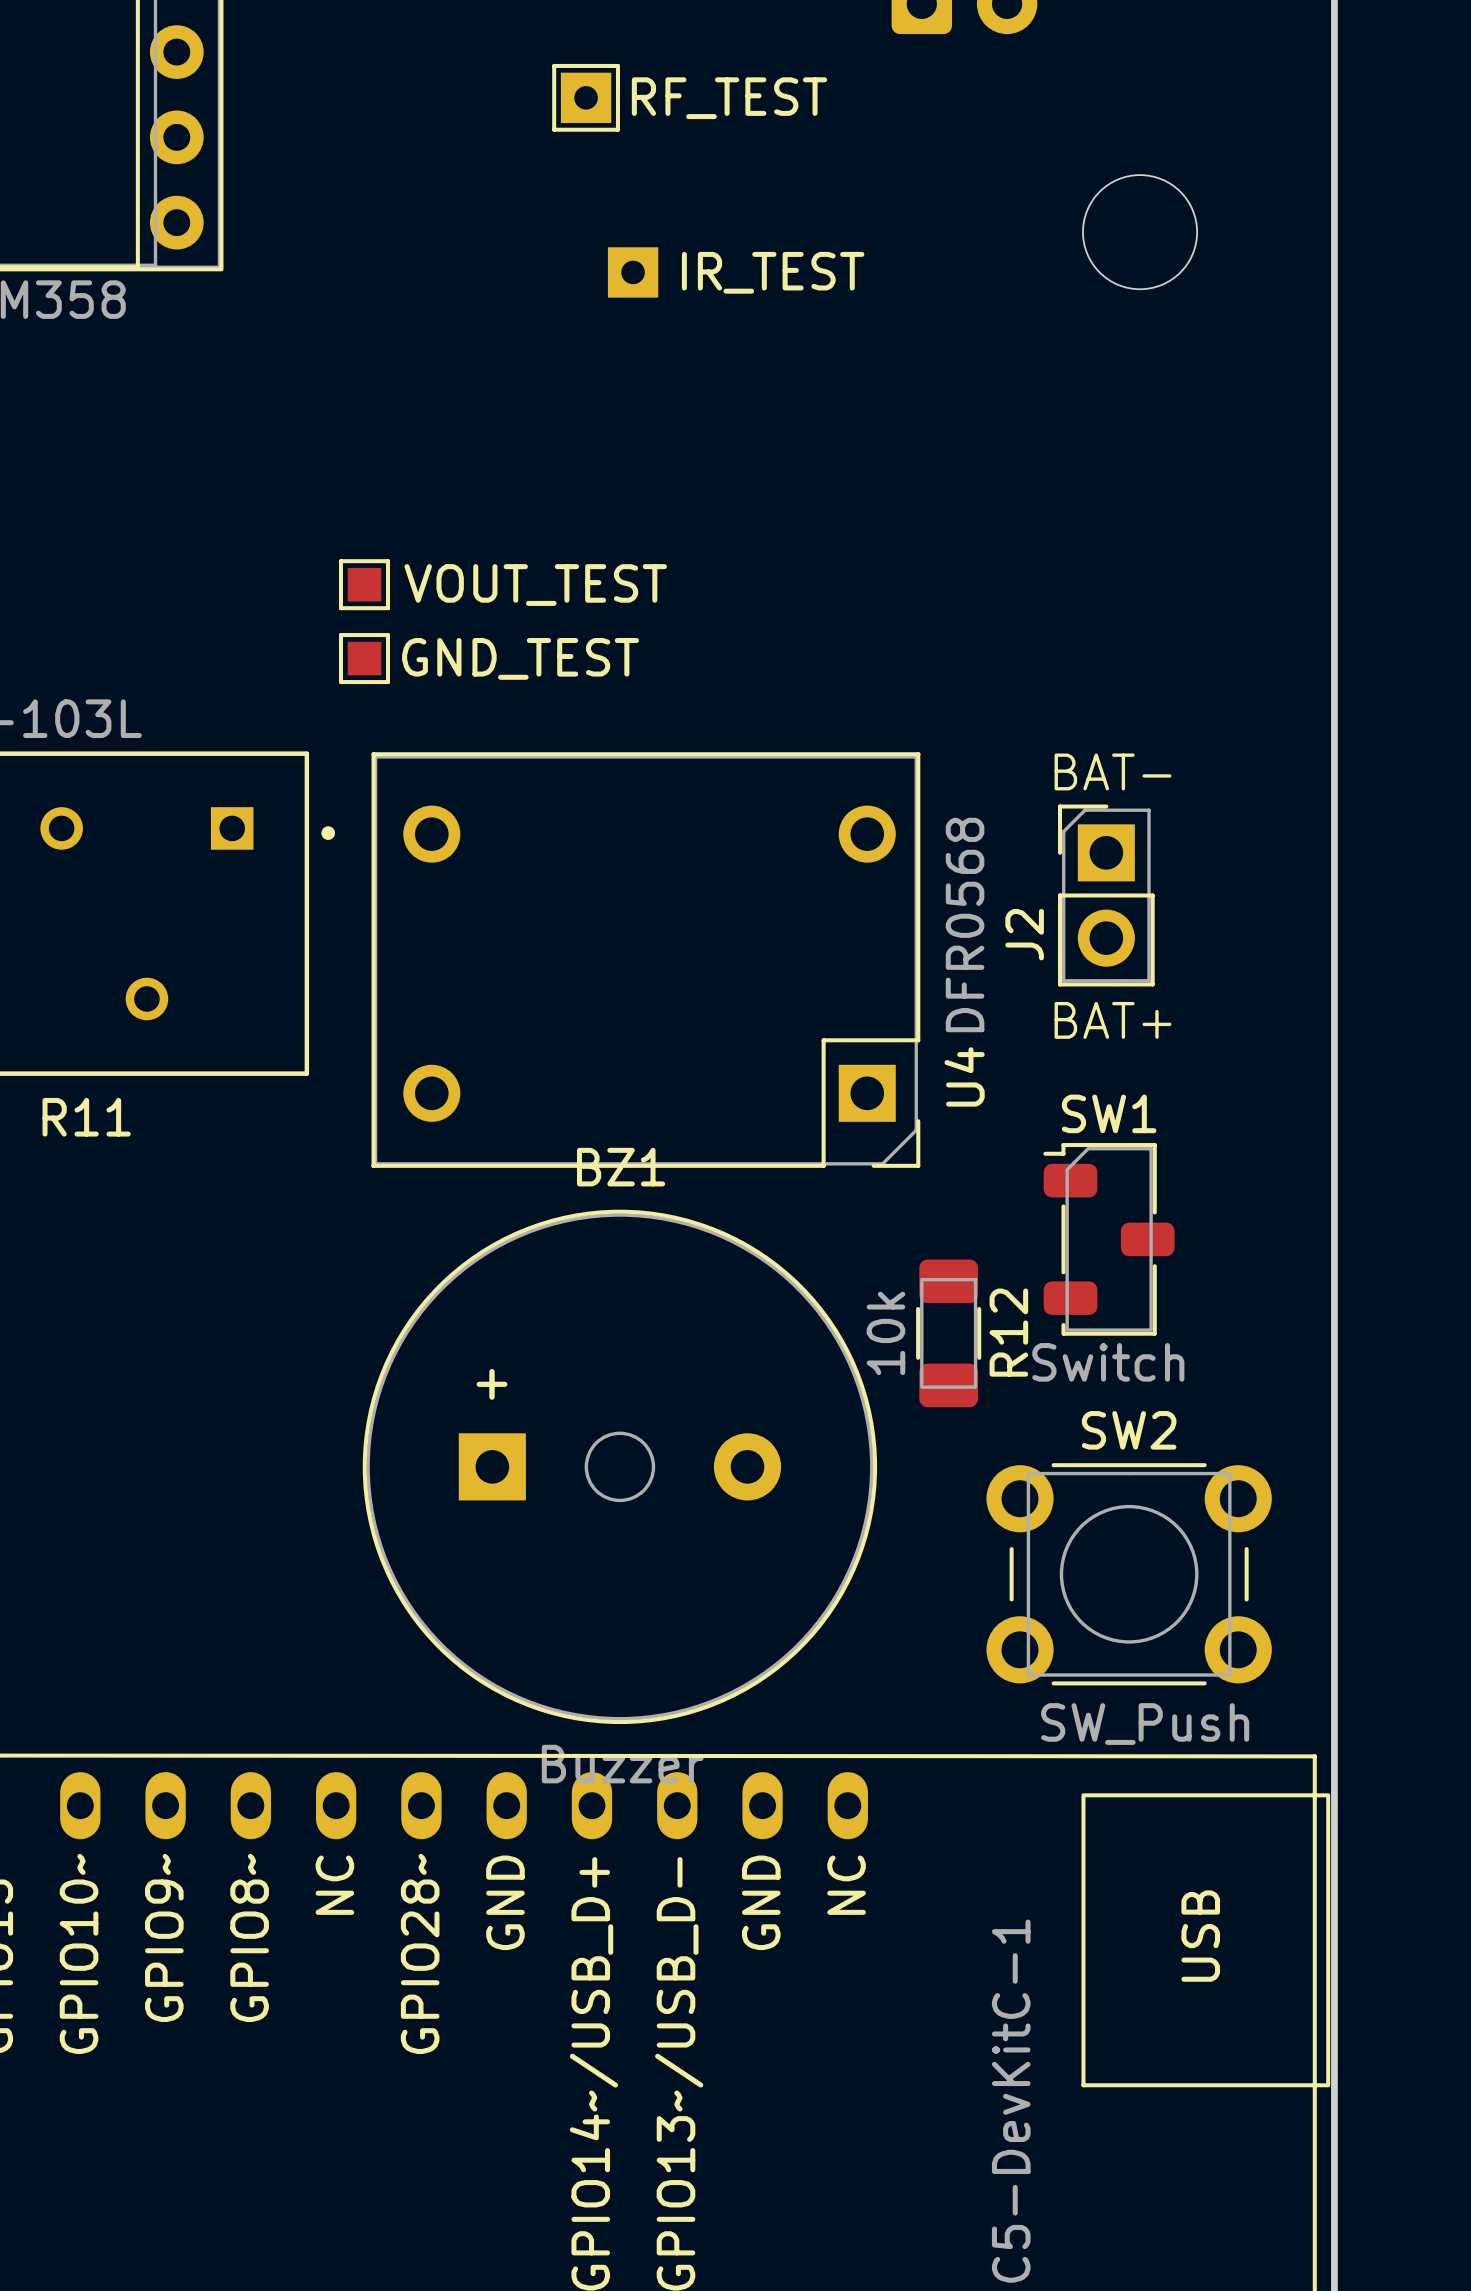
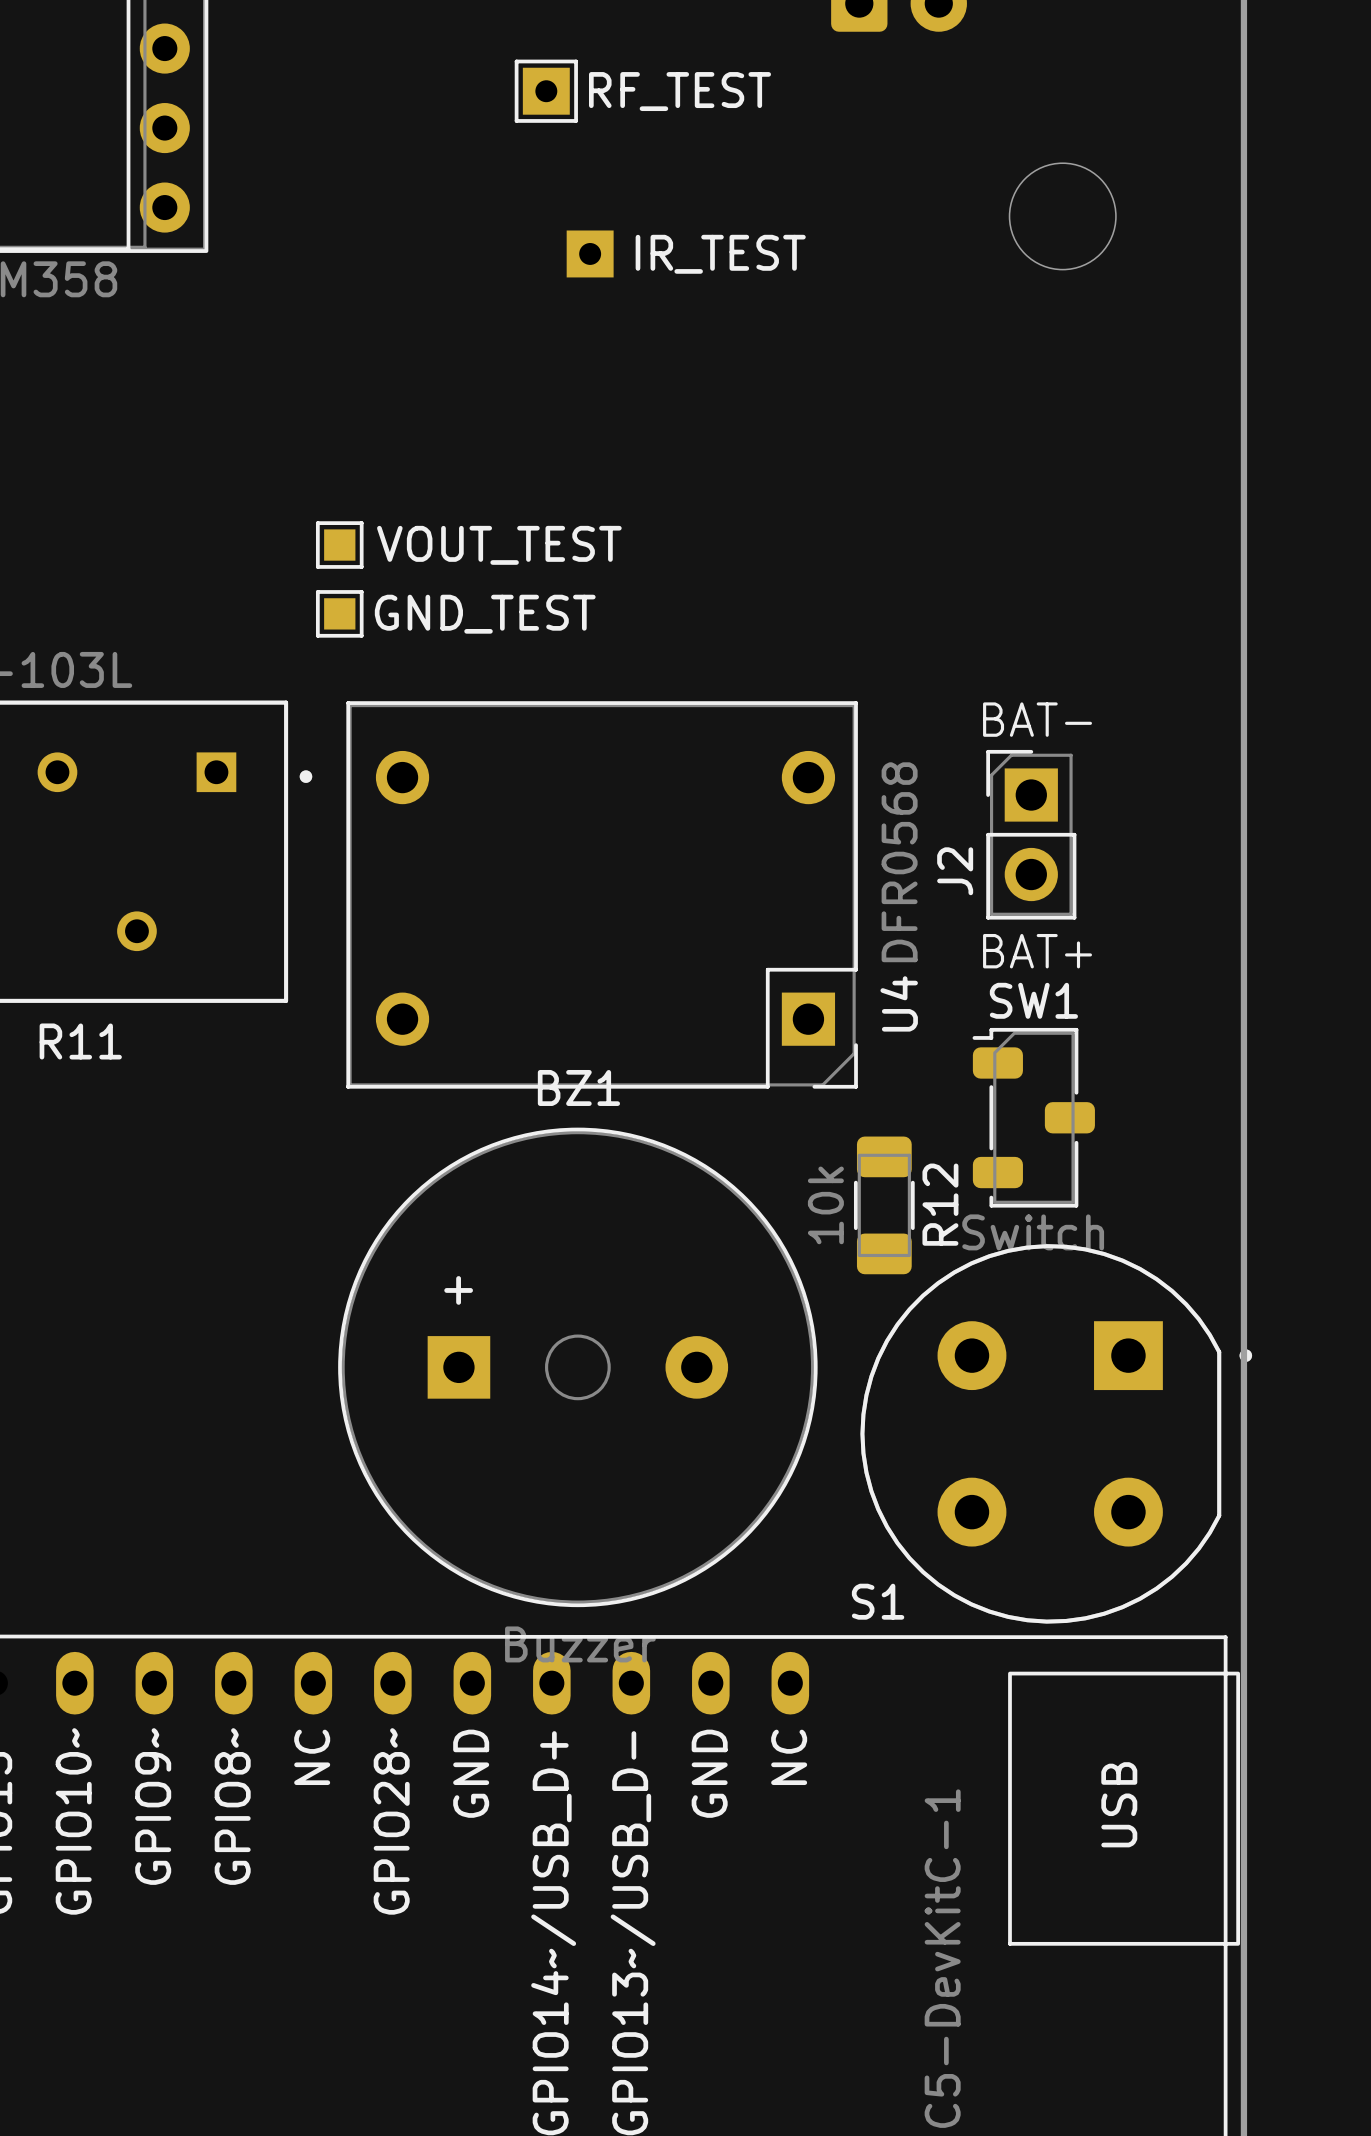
SW1 position: (1108, 1239) -> (1033, 1117)
R12 position: (948, 1333) -> (884, 1205)
S1: none -> (1056, 1433)
SW2: SW_Push (1129, 1574) -> none

